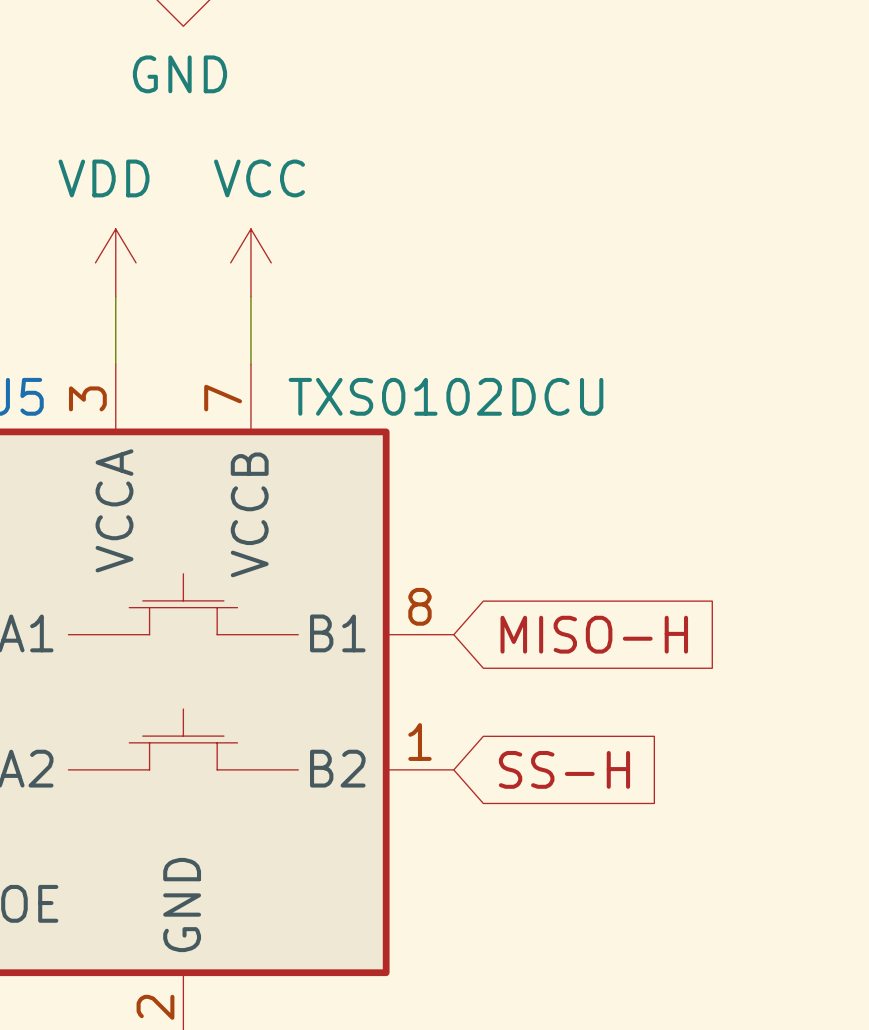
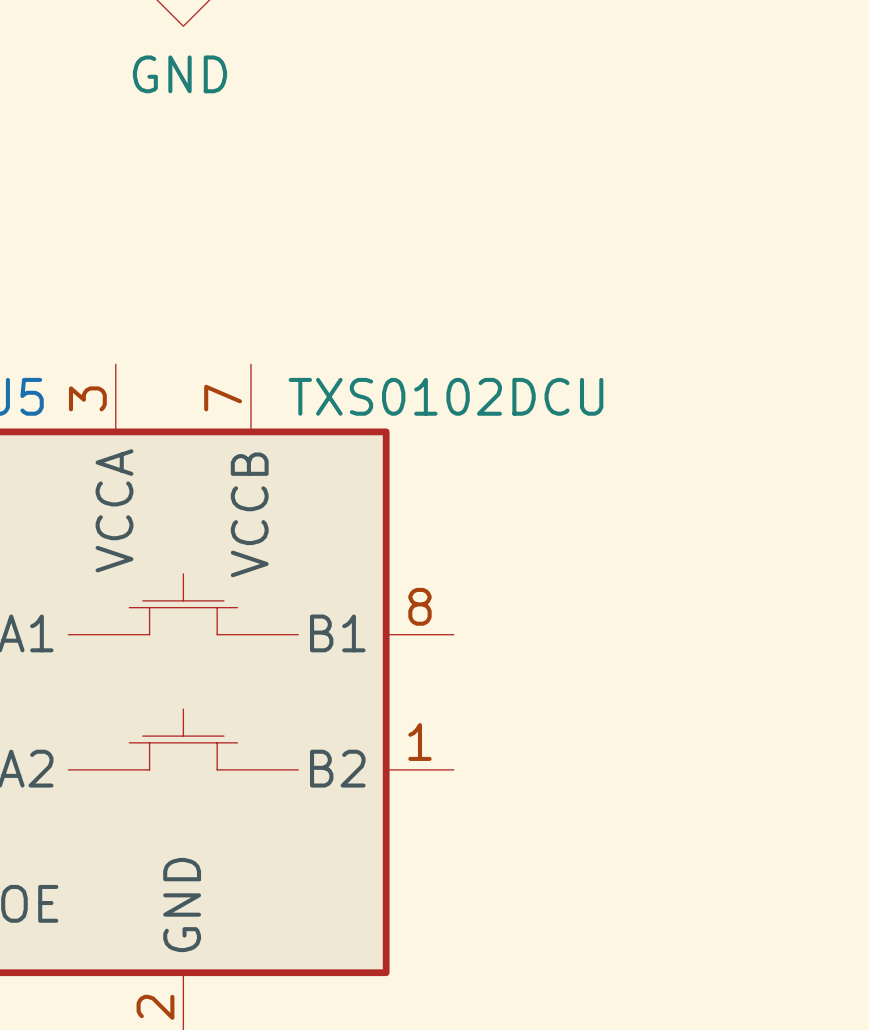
power symbol: VDD (115, 262) -> none
power symbol: VCC (250, 262) -> none
wire: (115, 296) (115, 364) -> none
wire: (250, 296) (250, 364) -> none
global label: MISO-H (594, 634) -> none
global label: SS-H (564, 769) -> none

